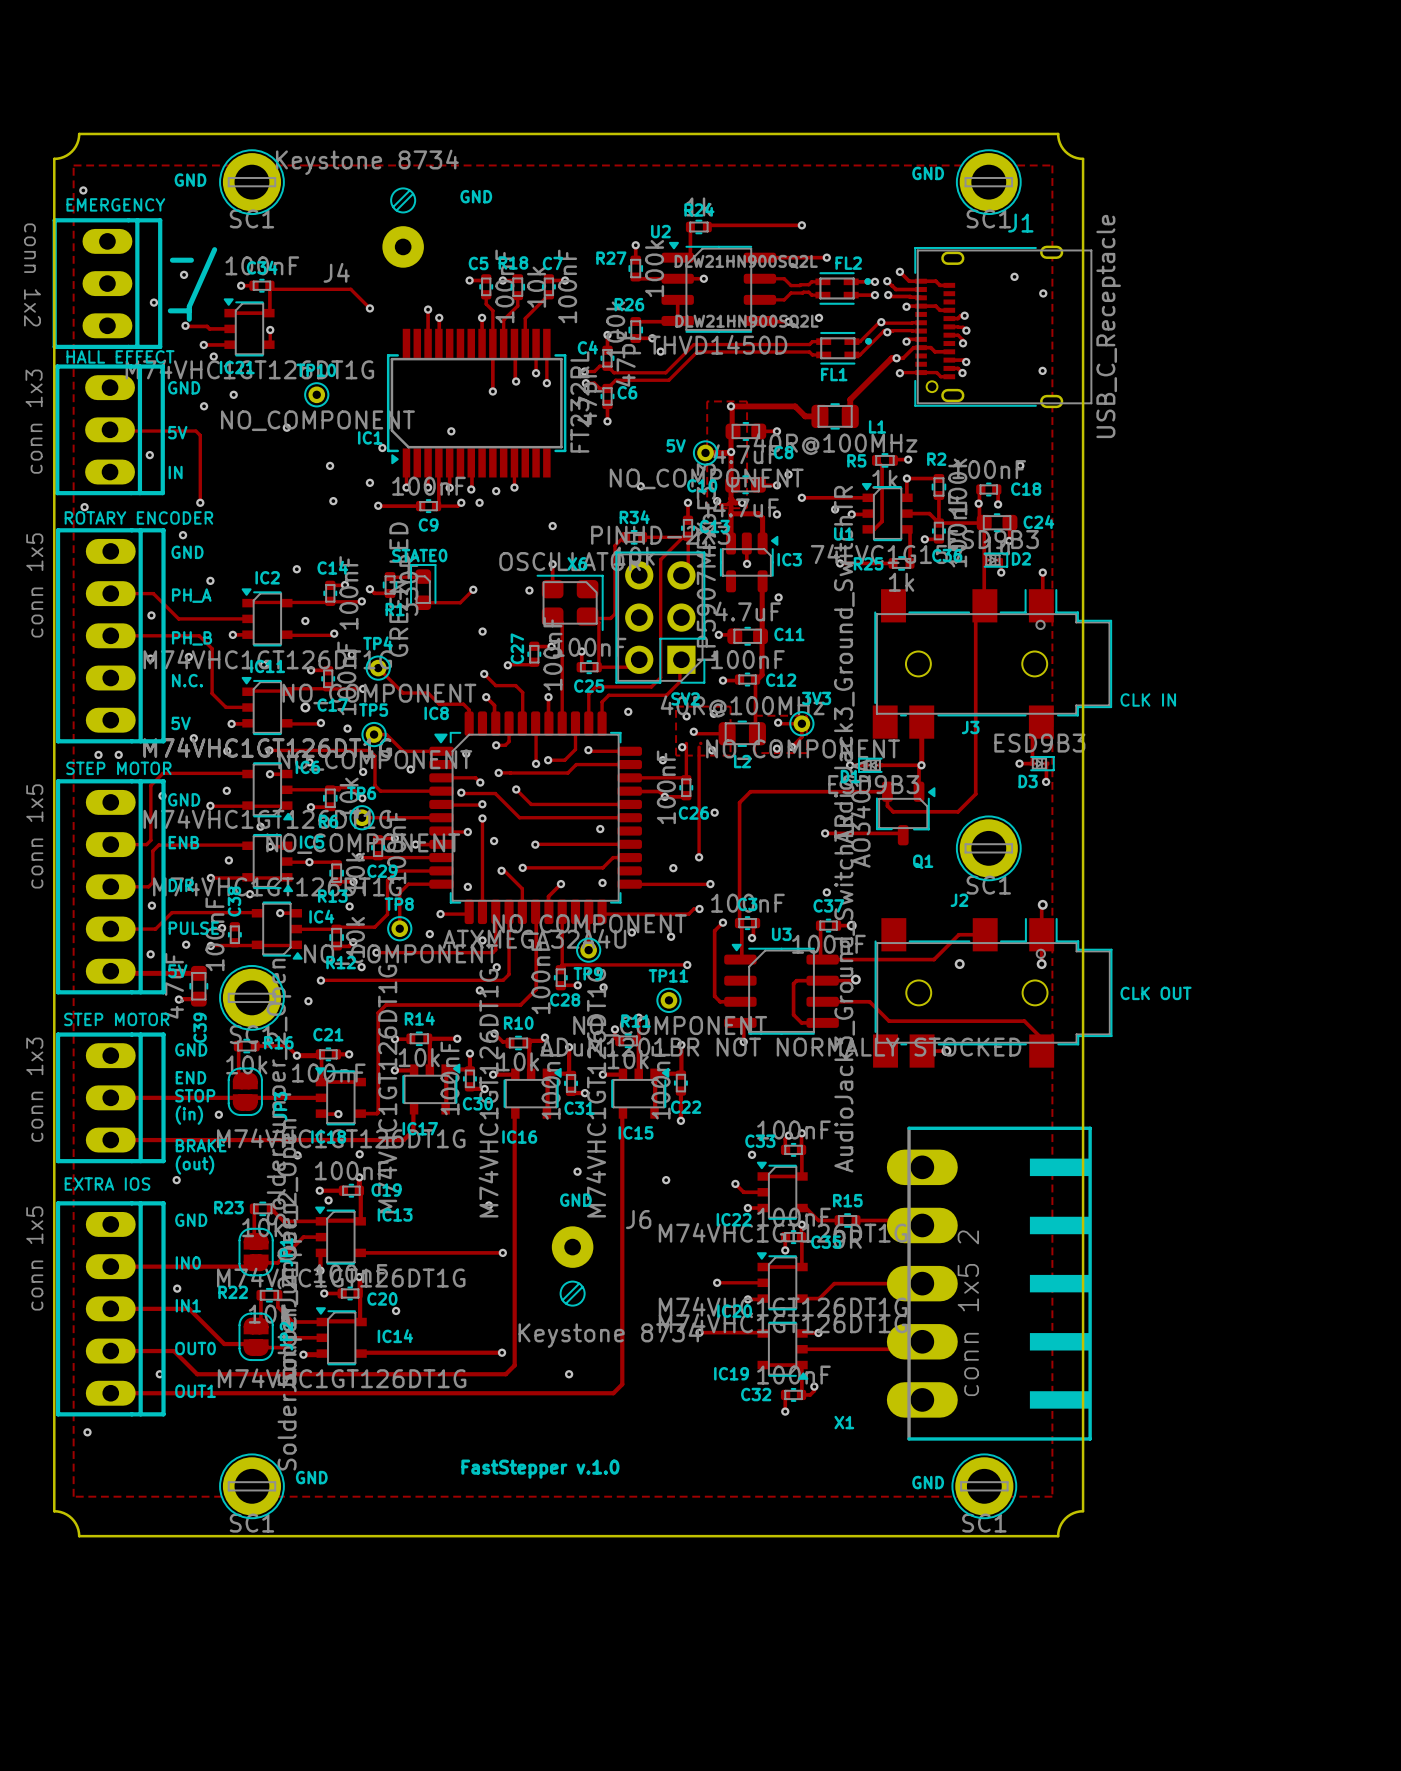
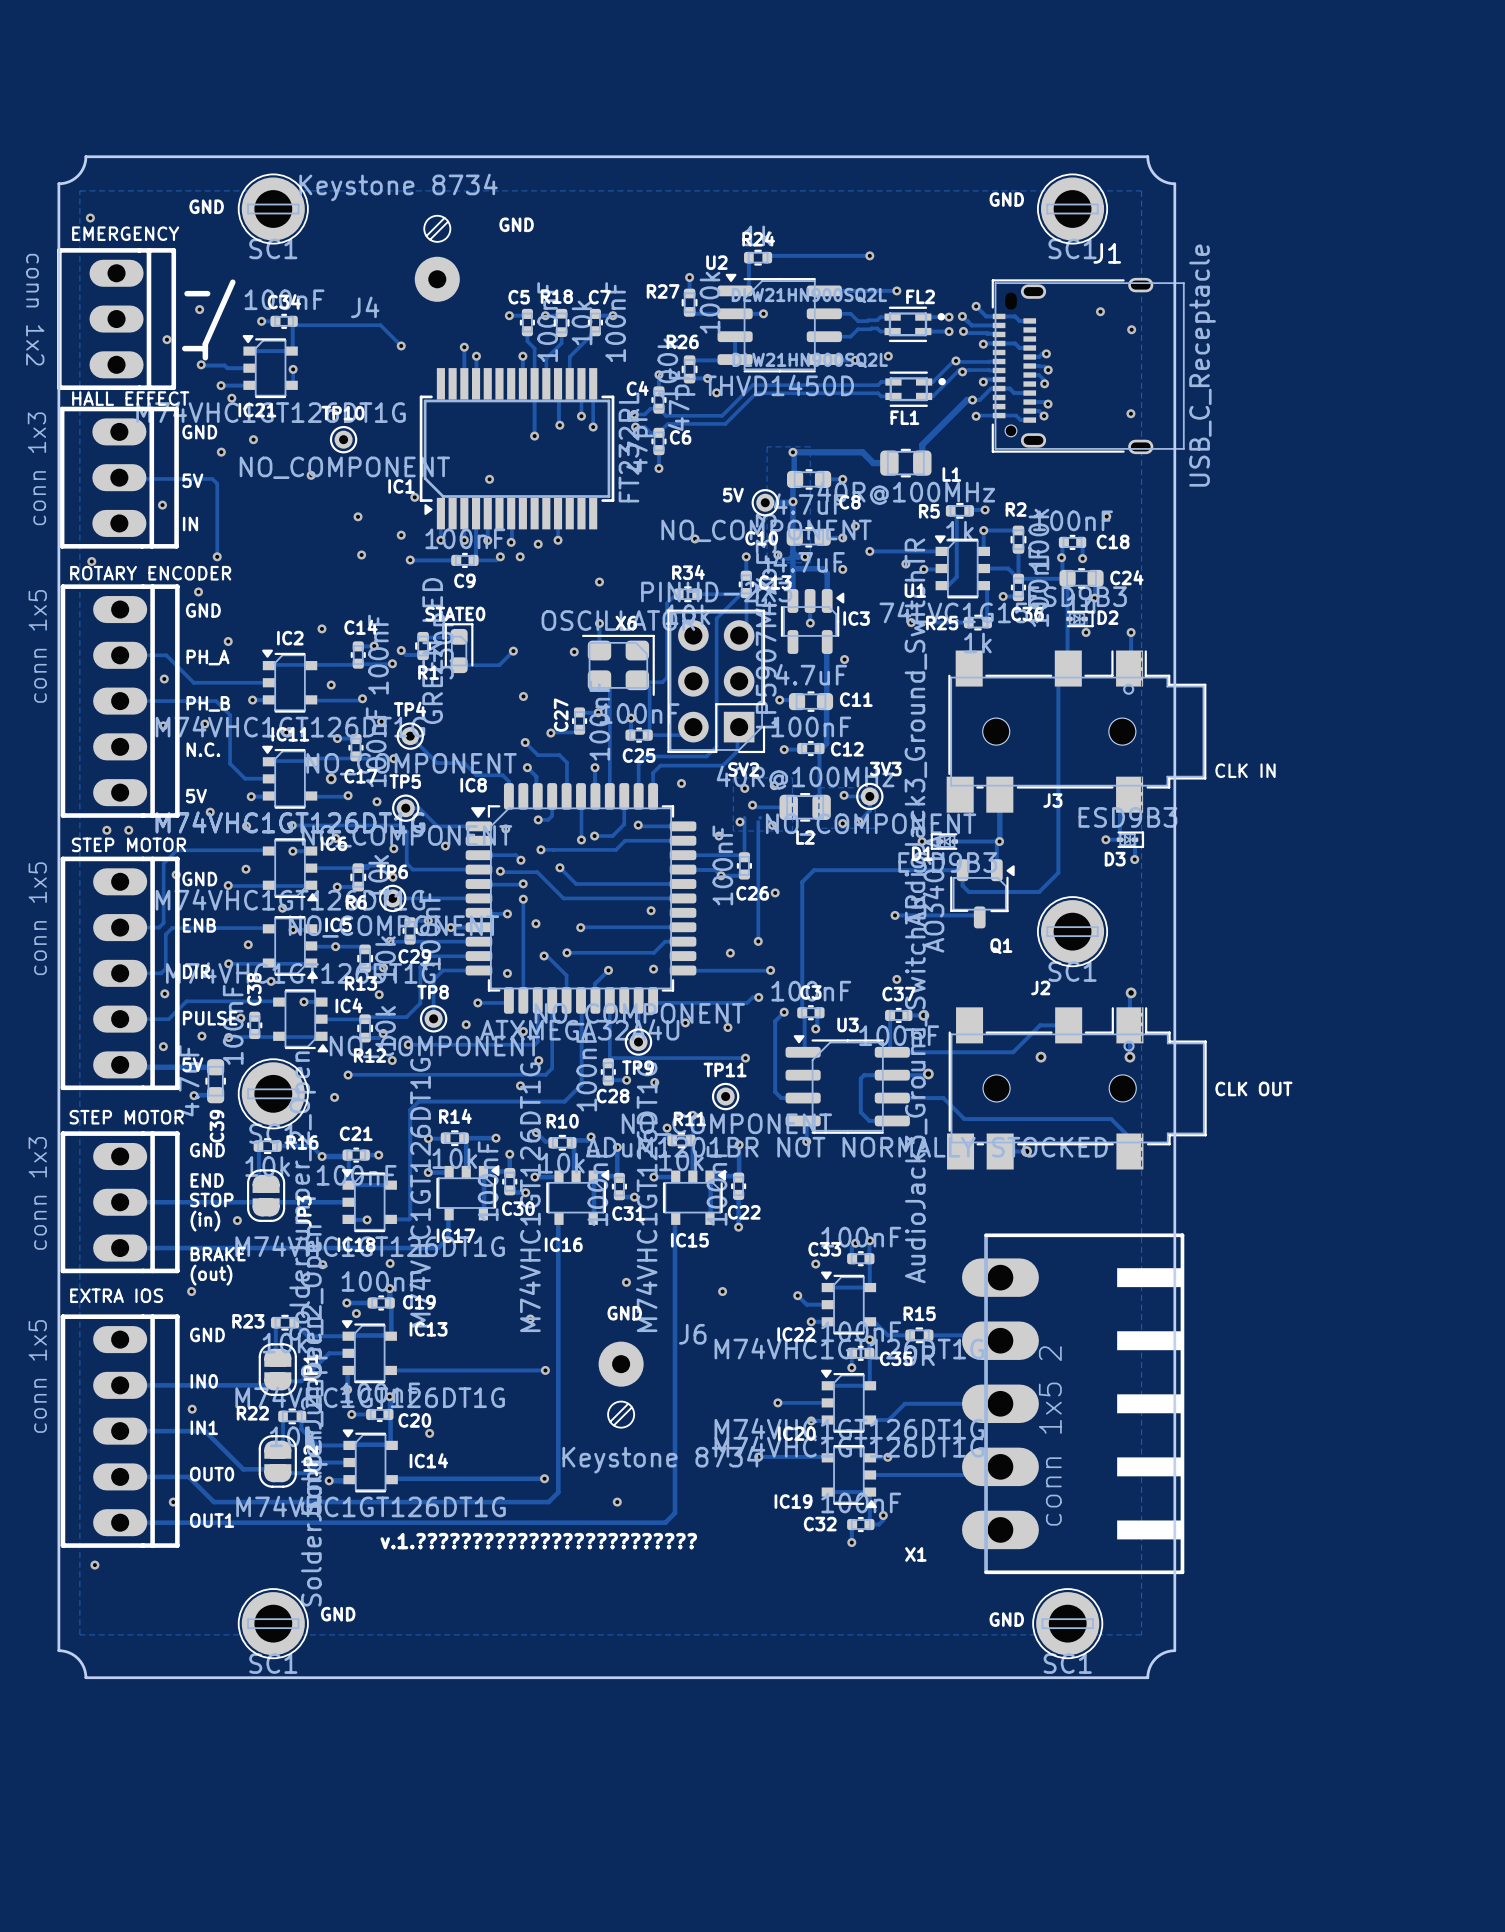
text: none -> v.1.????????????????????????? (538, 1541)
text: FastStepper v.1.0 (540, 1469) -> none

